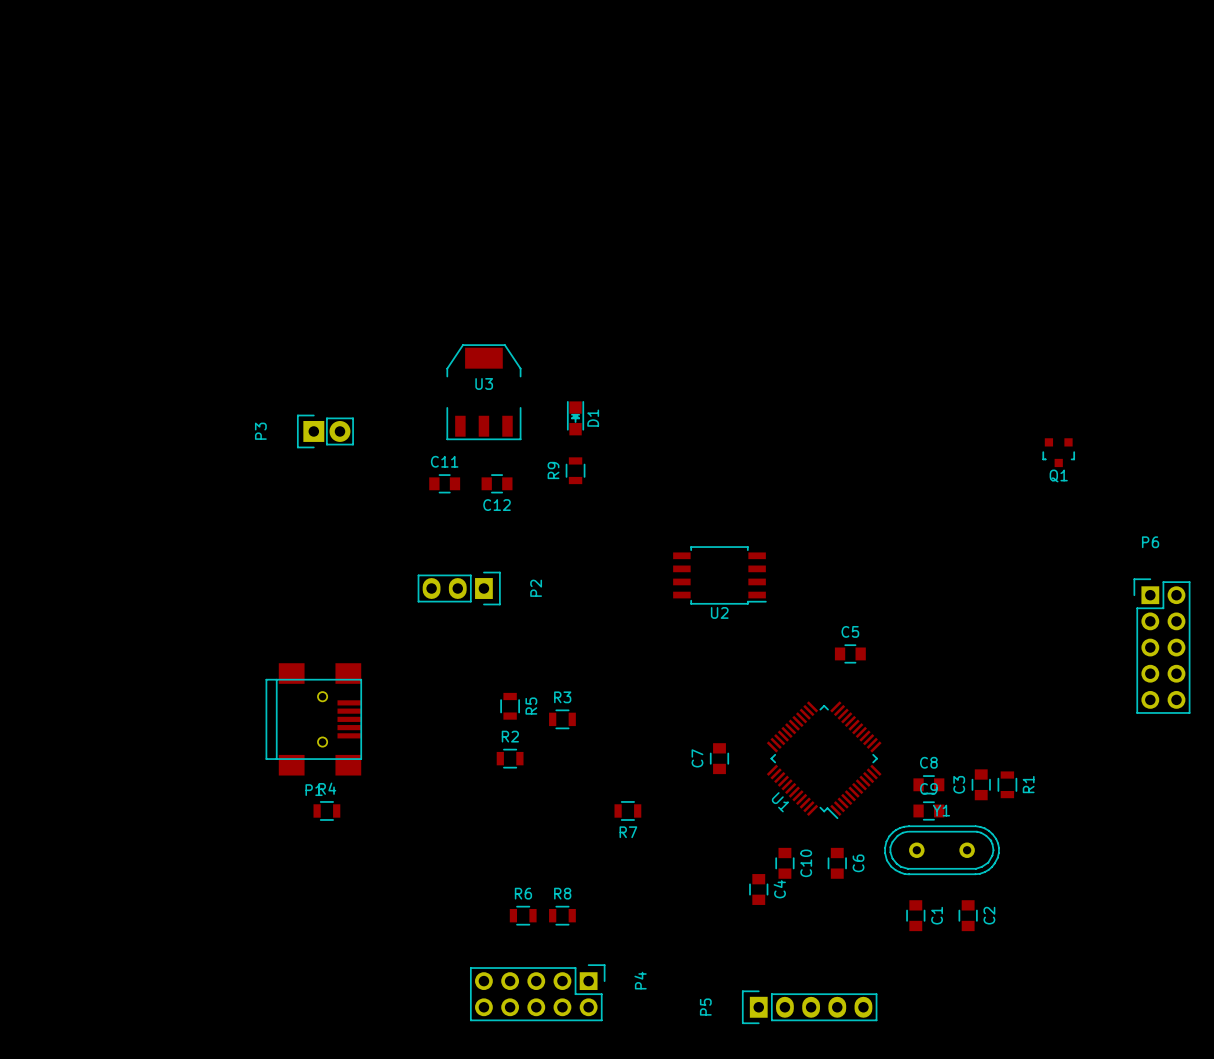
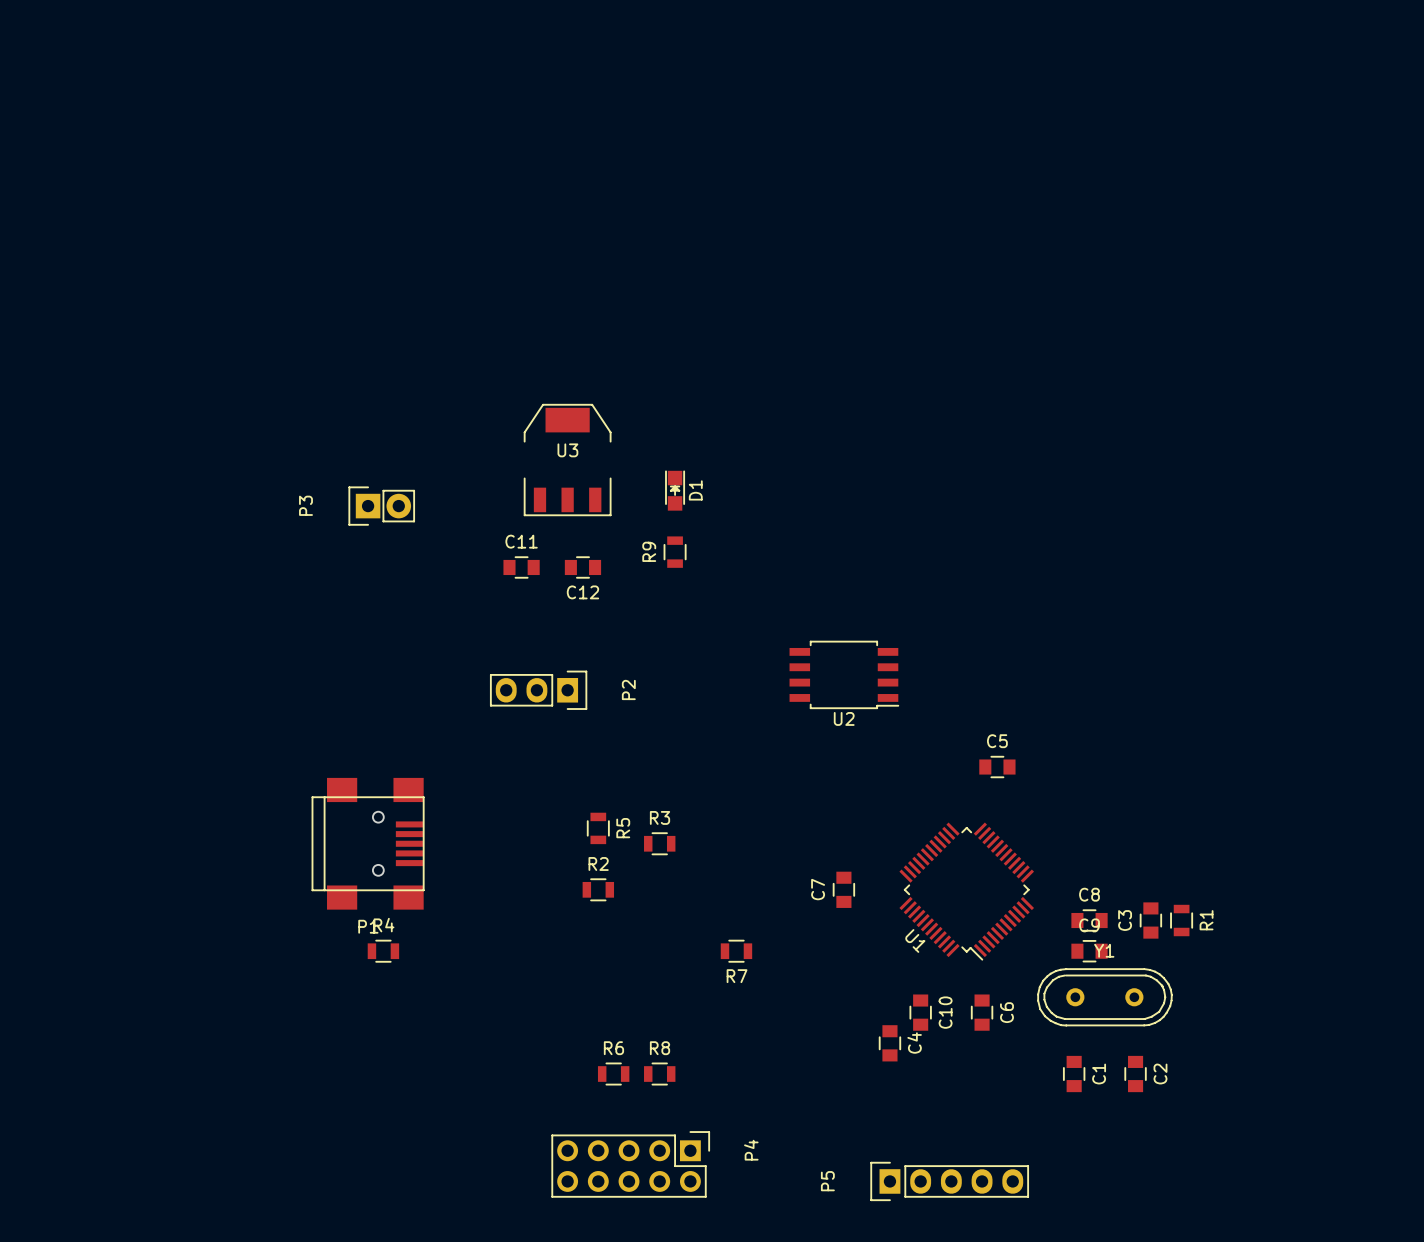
Q1: (1058, 452) -> none
P6: (1161, 646) -> none

